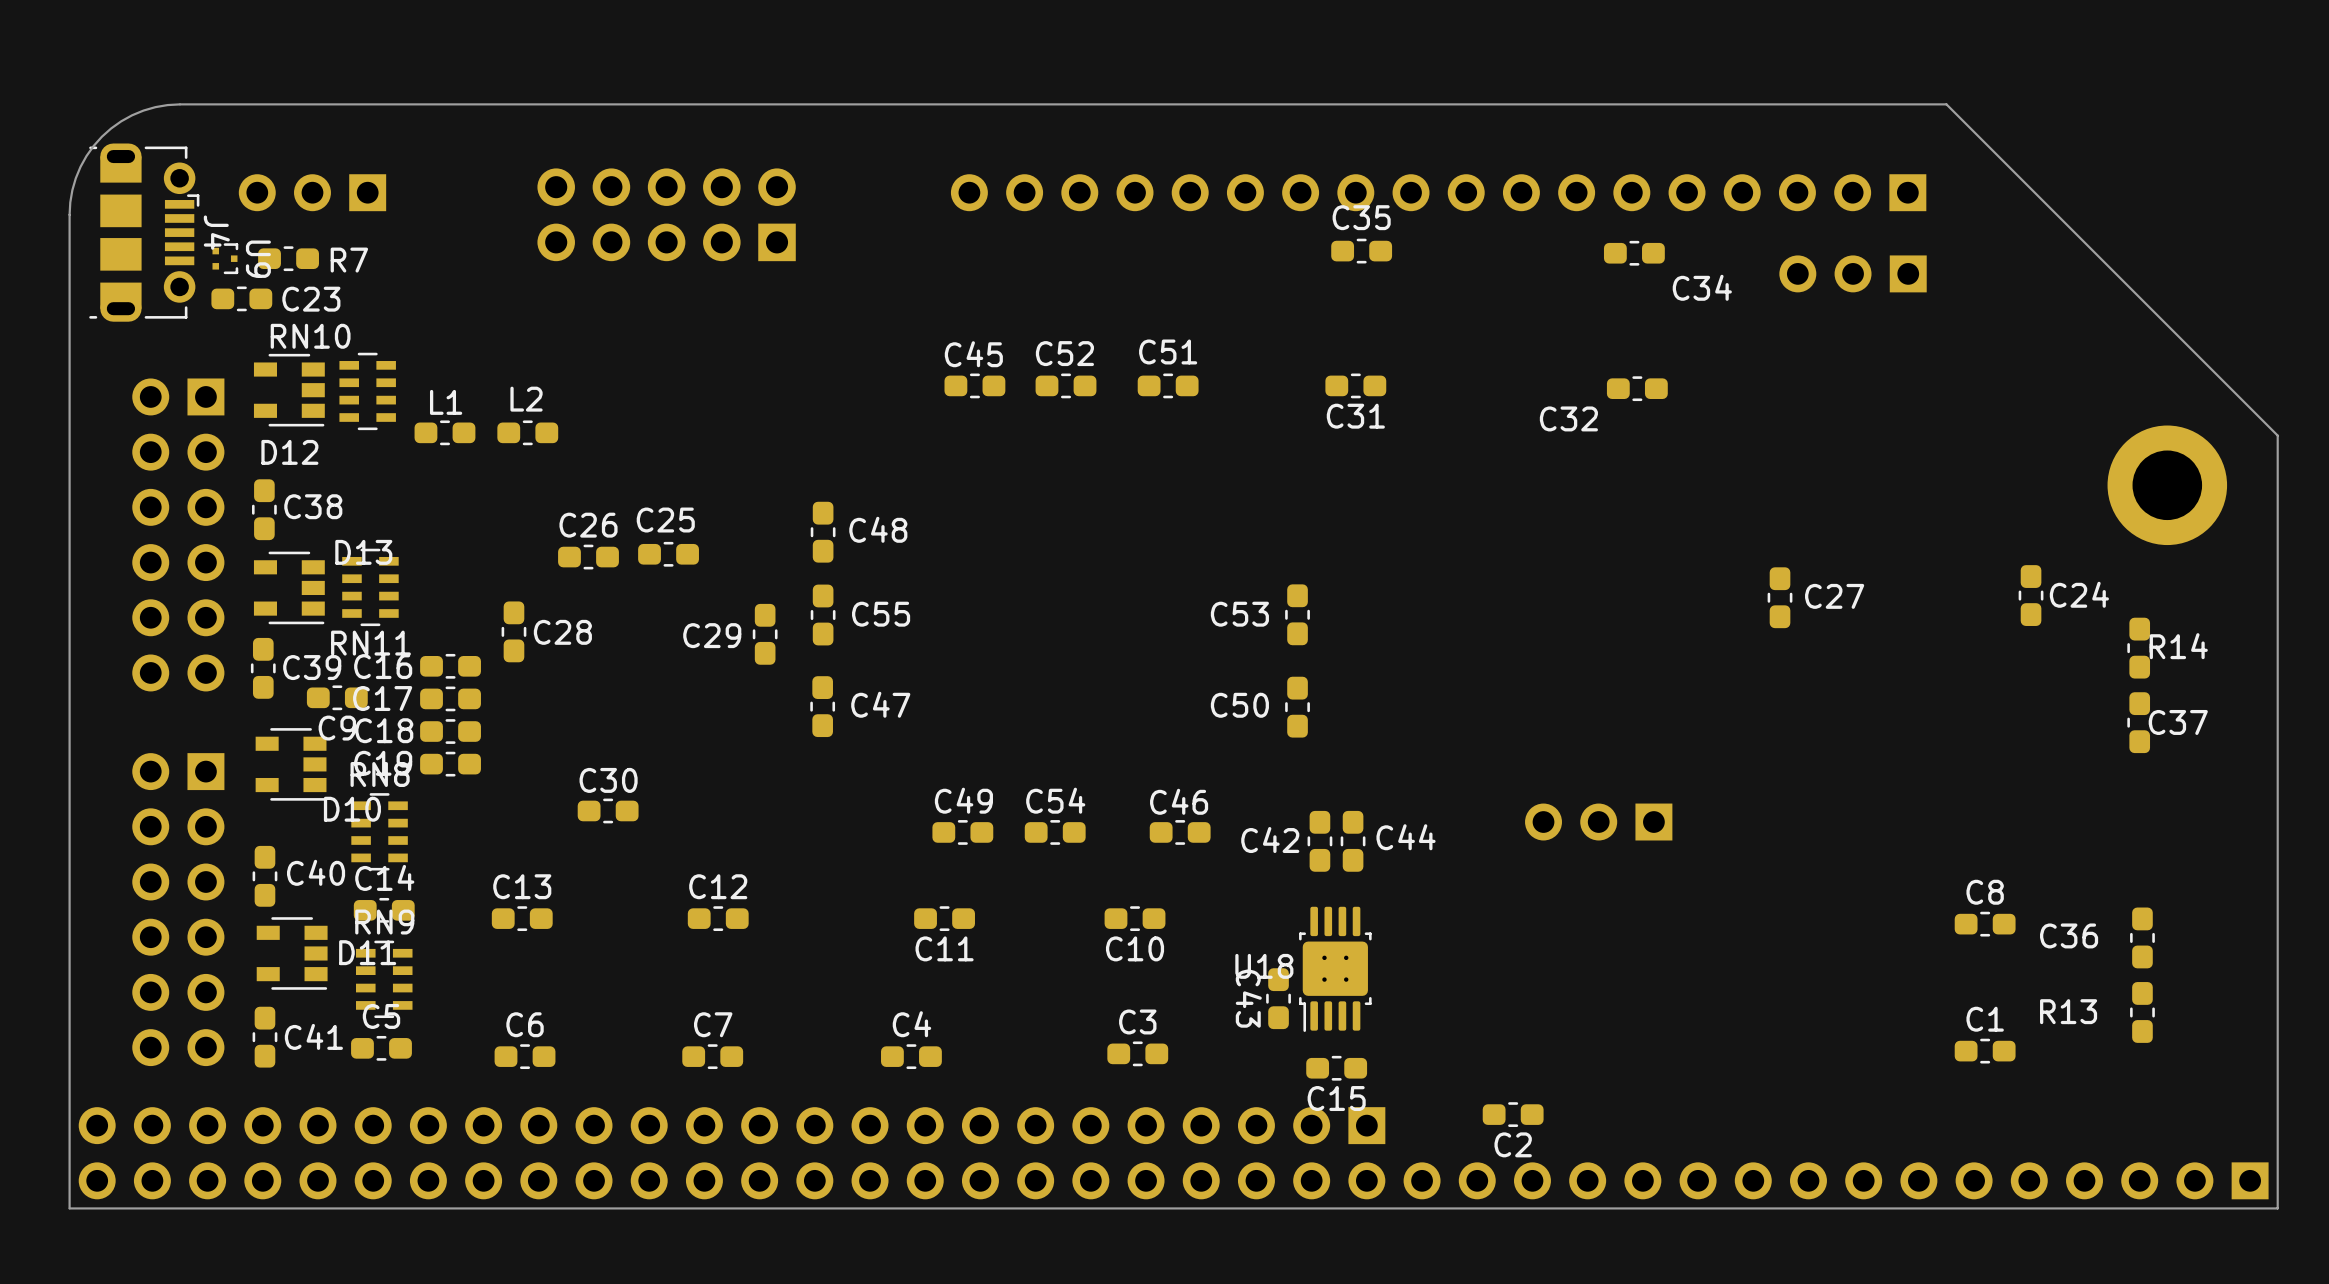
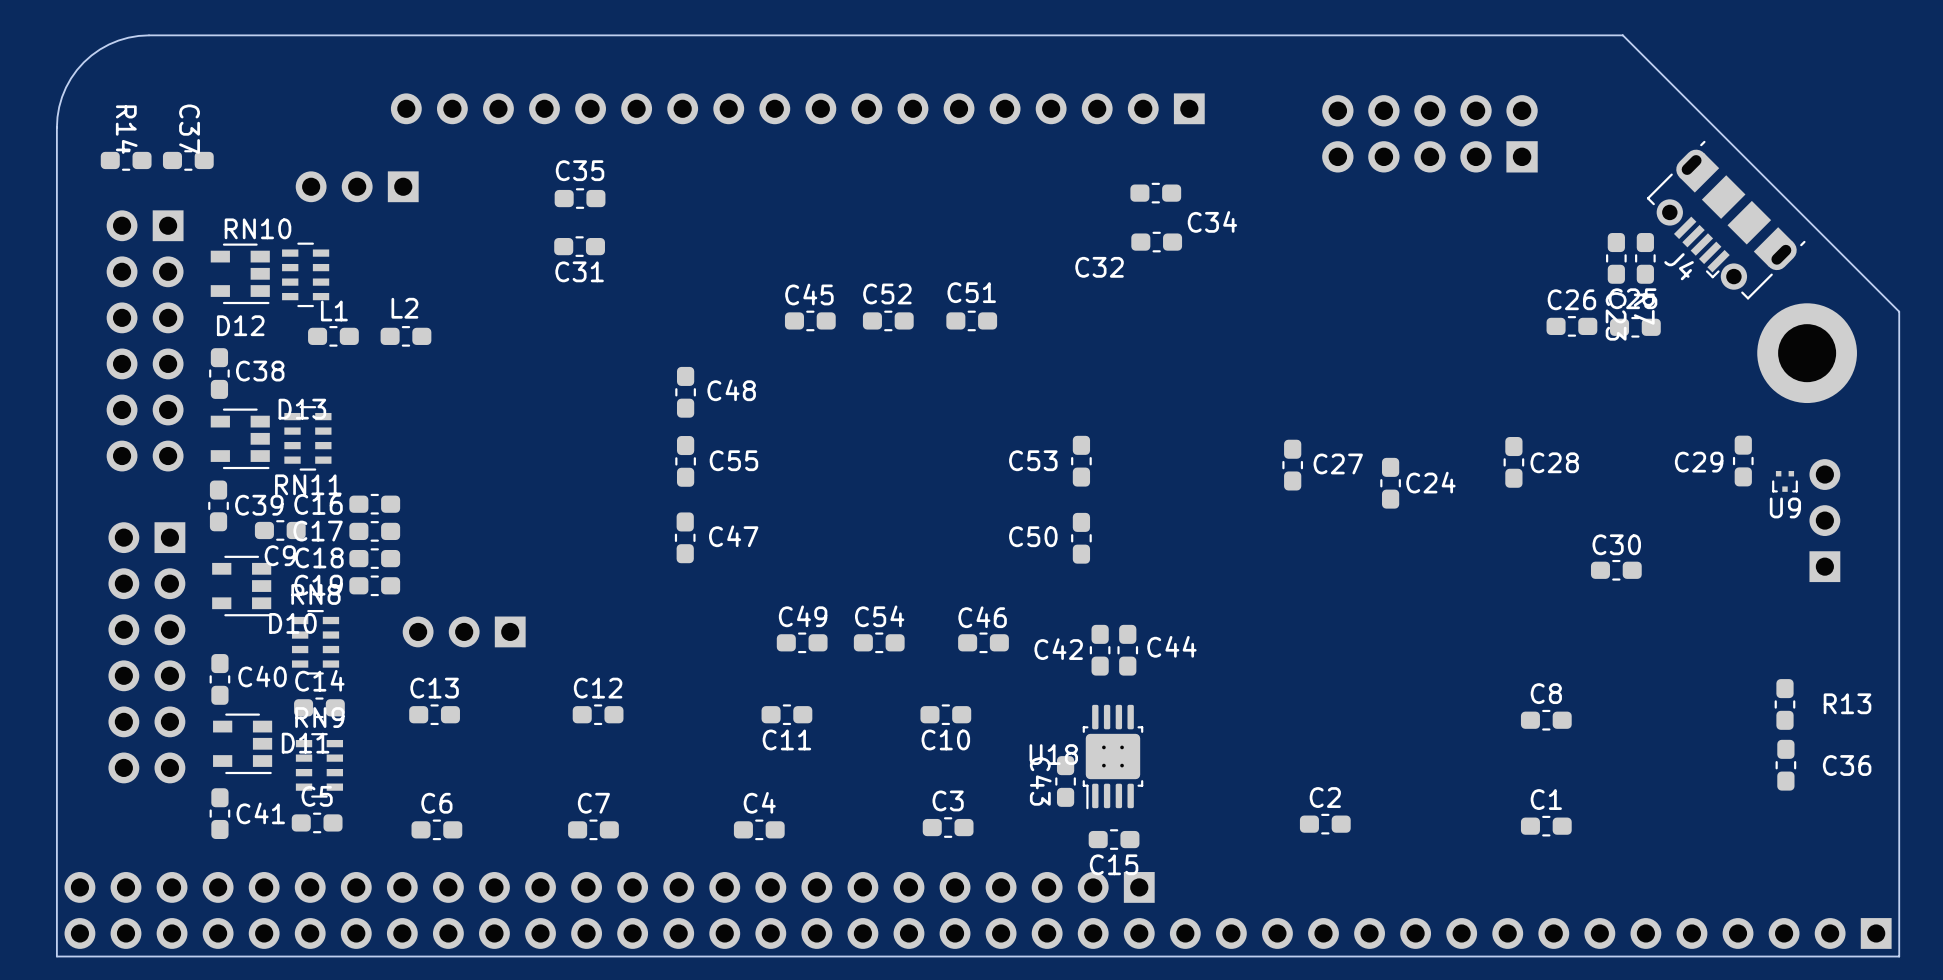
part position: (312, 192) -> (357, 186)
part position: (1438, 192) -> (797, 108)
part: (666, 214) -> none
part: none -> (1429, 133)
J4 rotation: 0° (144, 232) -> 135° clockwise (1726, 220)
J4 position: (144, 232) -> (1726, 220)
C35 position: (1361, 251) -> (580, 198)
C34 position: (1634, 253) -> (1155, 193)
U9 rotation: 0° (225, 258) -> 90° clockwise (1784, 481)
U9 position: (225, 258) -> (1784, 481)
R7 rotation: 0° (288, 258) -> 90° clockwise (1645, 258)
R7 position: (288, 258) -> (1645, 258)
part: (1853, 273) -> none
C23 rotation: 0° (241, 298) -> 90° clockwise (1616, 258)
C23 position: (241, 298) -> (1616, 258)
C45 position: (974, 385) -> (810, 320)
C52 position: (1066, 385) -> (888, 320)
C51 position: (1168, 385) -> (971, 320)
C31 position: (1355, 385) -> (579, 246)
C32 position: (1637, 388) -> (1156, 242)
L1 position: (444, 432) -> (333, 336)
L2 position: (527, 432) -> (405, 336)
part position: (178, 534) -> (145, 340)
C25 position: (668, 554) -> (1635, 327)
C26 position: (588, 557) -> (1571, 326)
C24 position: (2031, 595) -> (1390, 483)
C27 position: (1780, 597) -> (1292, 465)
C28 position: (513, 631) -> (1513, 462)
C29 position: (765, 634) -> (1743, 461)
R14 name position: R14 (2178, 646) -> R14 (126, 129)
R14 rotation: 0° (2139, 648) -> 90° clockwise (126, 160)
R14 position: (2139, 648) -> (126, 160)
part: none -> (1824, 520)
C37 rotation: 0° (2139, 722) -> 90° clockwise (188, 160)
C37 position: (2139, 722) -> (188, 160)
C37 name position: C37 (2178, 722) -> C37 (189, 129)
C30 position: (608, 810) -> (1616, 570)
part: none -> (464, 631)
part: (1598, 822) -> none
part position: (178, 909) -> (146, 652)
C8 position: (1985, 924) -> (1546, 720)
C36 name position: C36 (2069, 935) -> C36 (1847, 765)
C36 position: (2142, 937) -> (1785, 765)
R13 name position: R13 (2068, 1011) -> R13 (1847, 703)
R13 position: (2142, 1012) -> (1784, 704)
C1 position: (1985, 1051) -> (1546, 826)
C2 position: (1513, 1114) -> (1325, 824)
C2 name position: C2 (1513, 1144) -> C2 (1325, 797)

